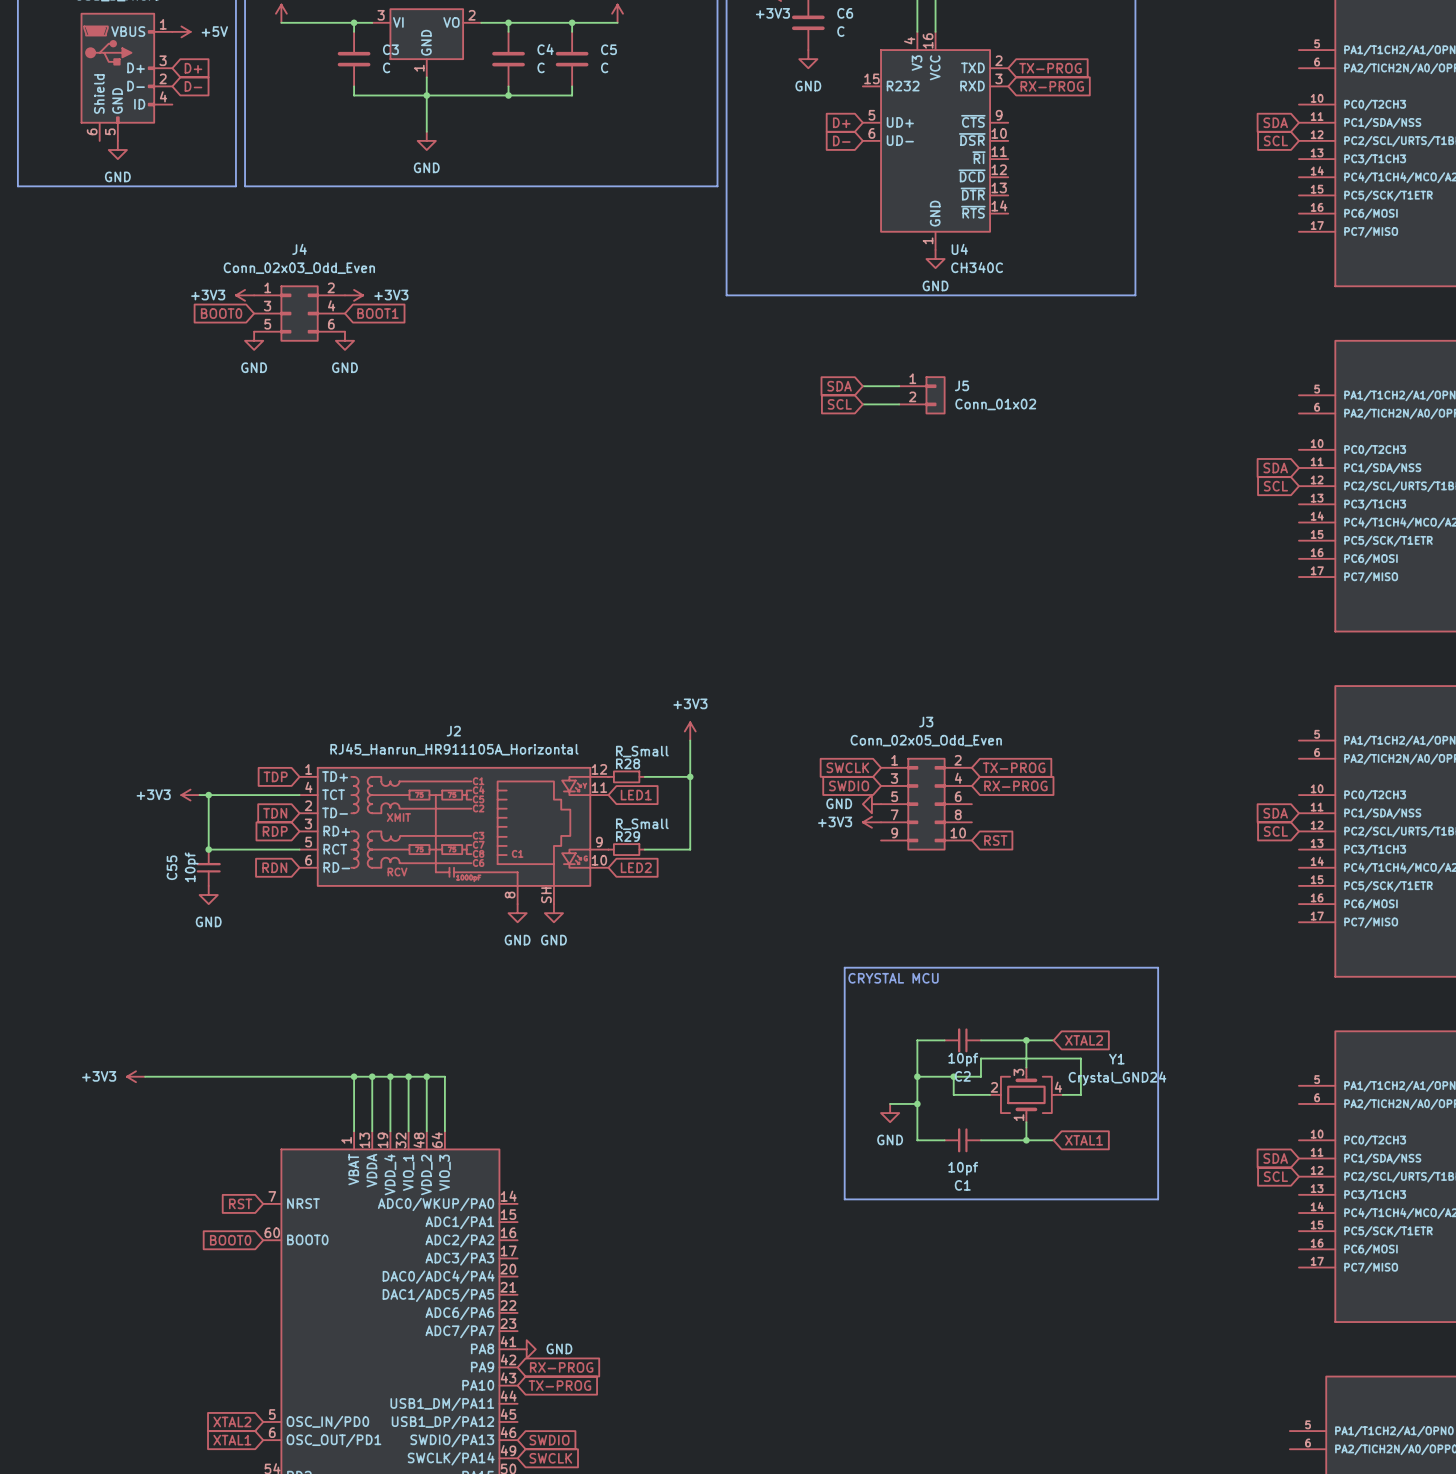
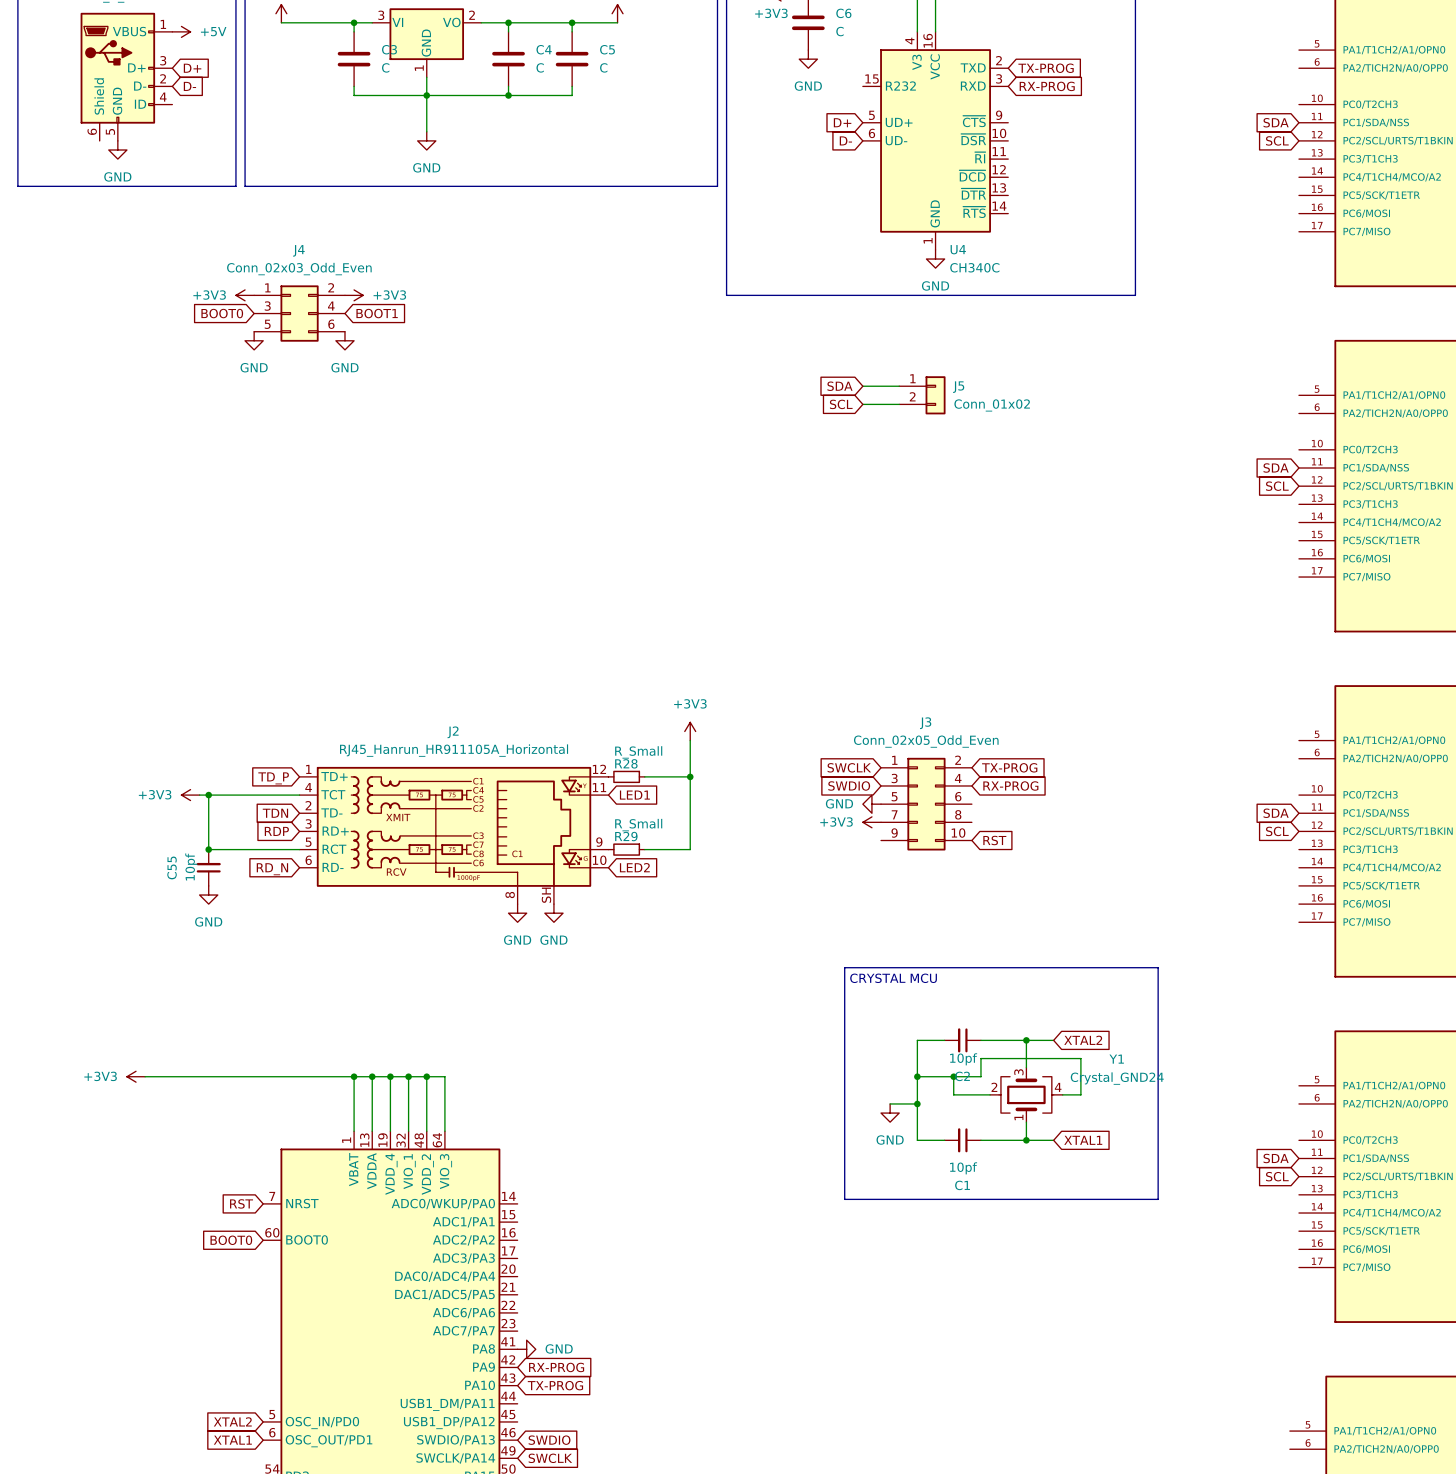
global label: TDP (275, 776) -> TD_P (273, 778)
global label: RDN (274, 867) -> RD_N (272, 869)

